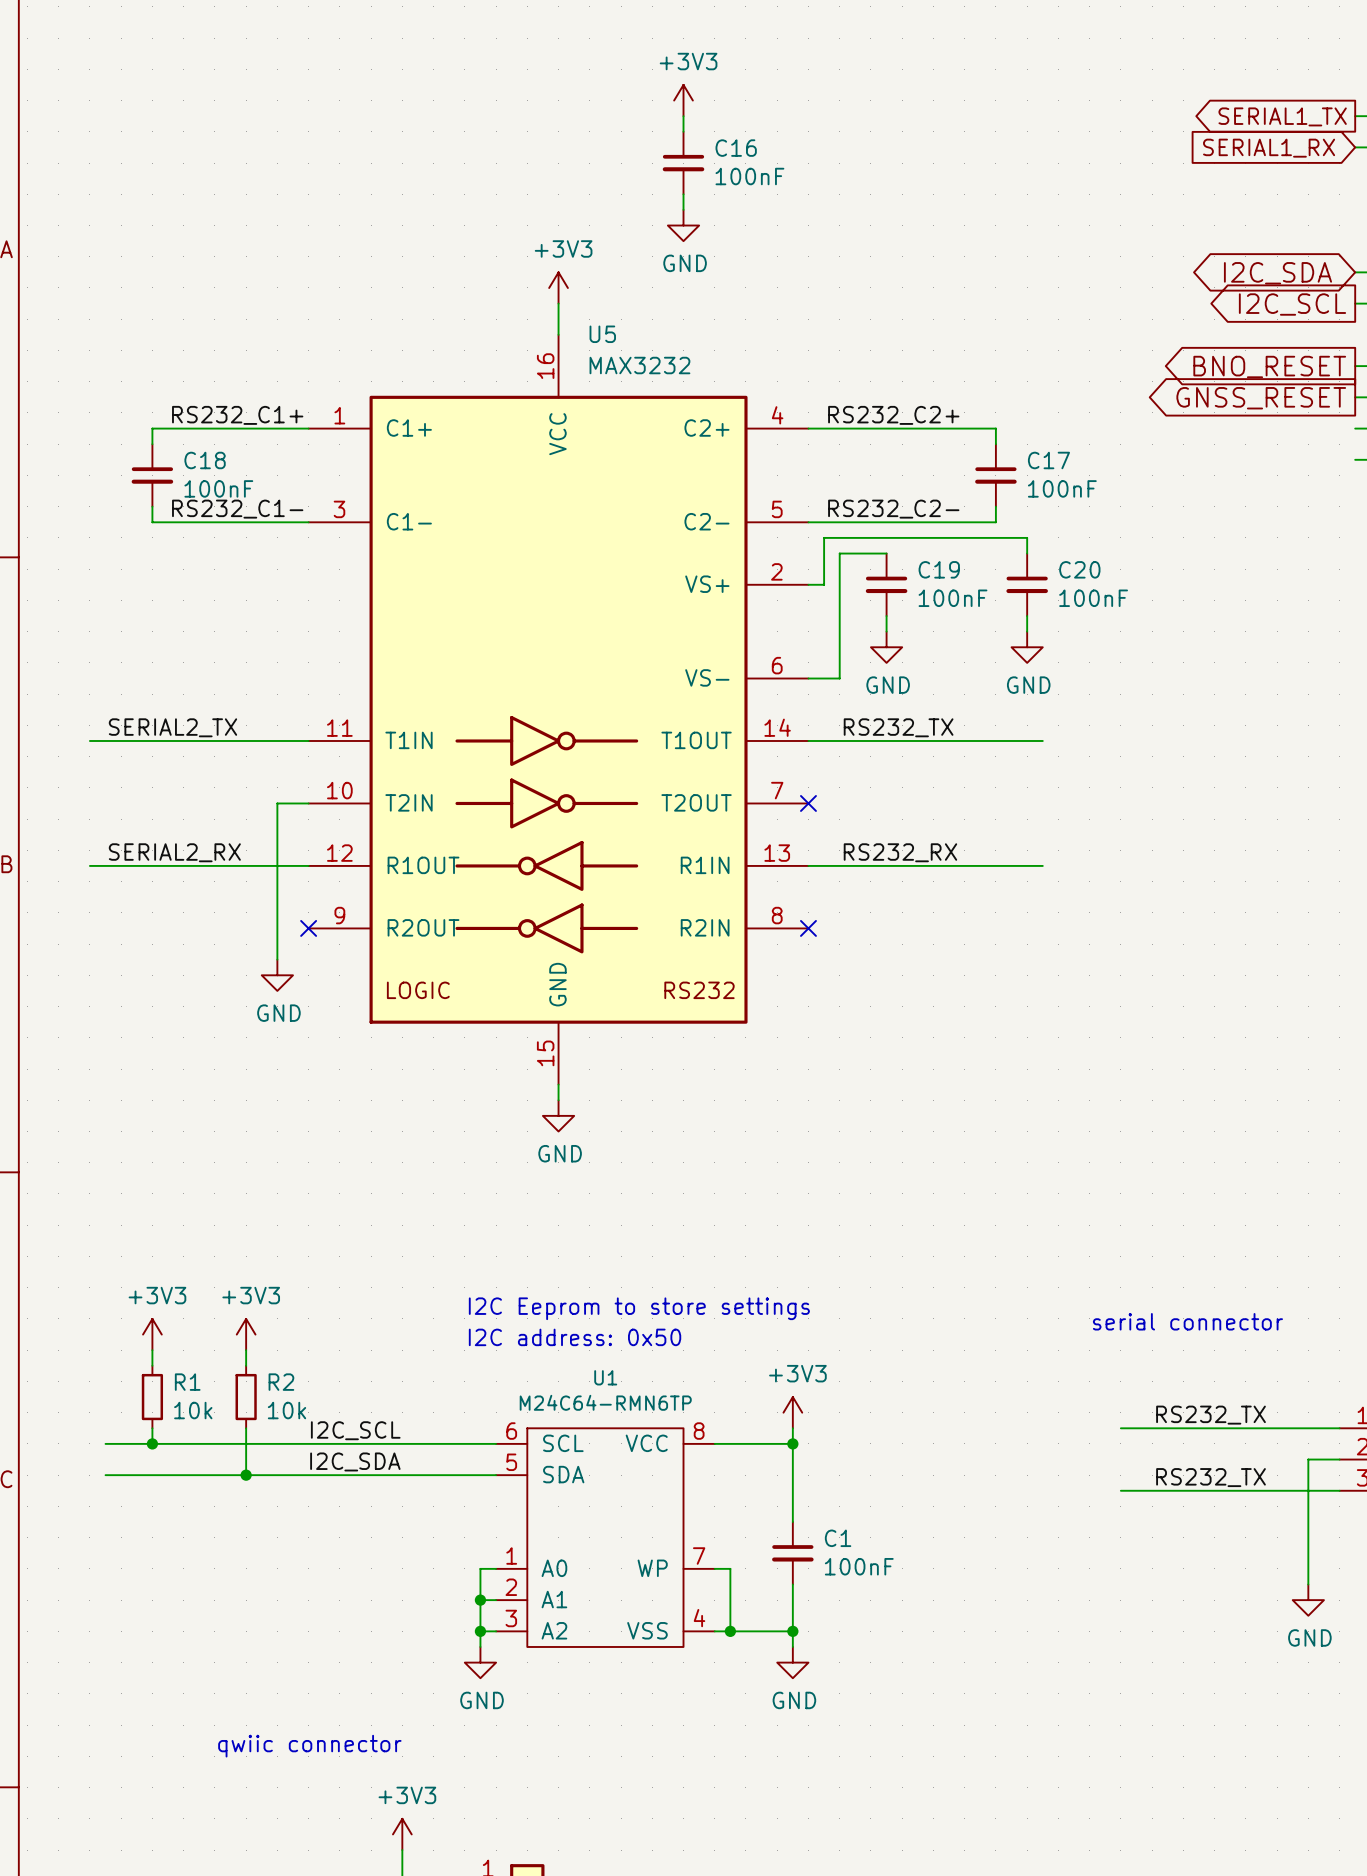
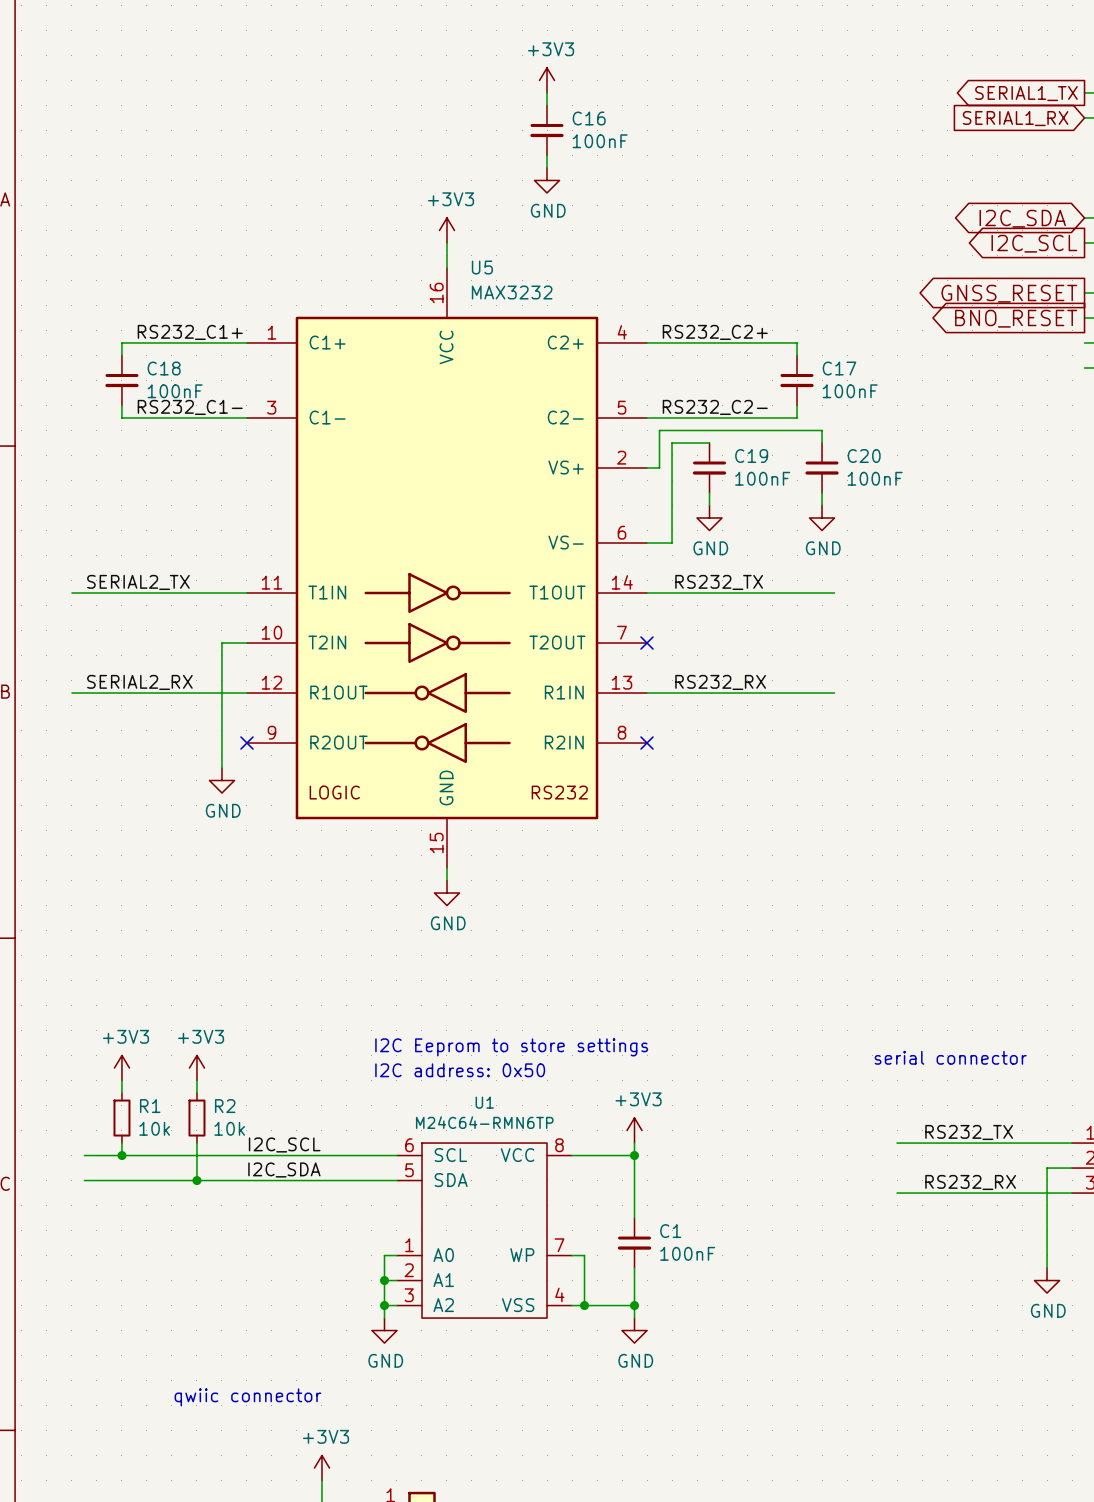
global label: BNO_RESET (1269, 366) -> GNSS_RESET (1009, 293)
global label: GNSS_RESET (1261, 398) -> BNO_RESET (1016, 318)
label: RS232_TX (1211, 1477) -> RS232_RX (970, 1182)

